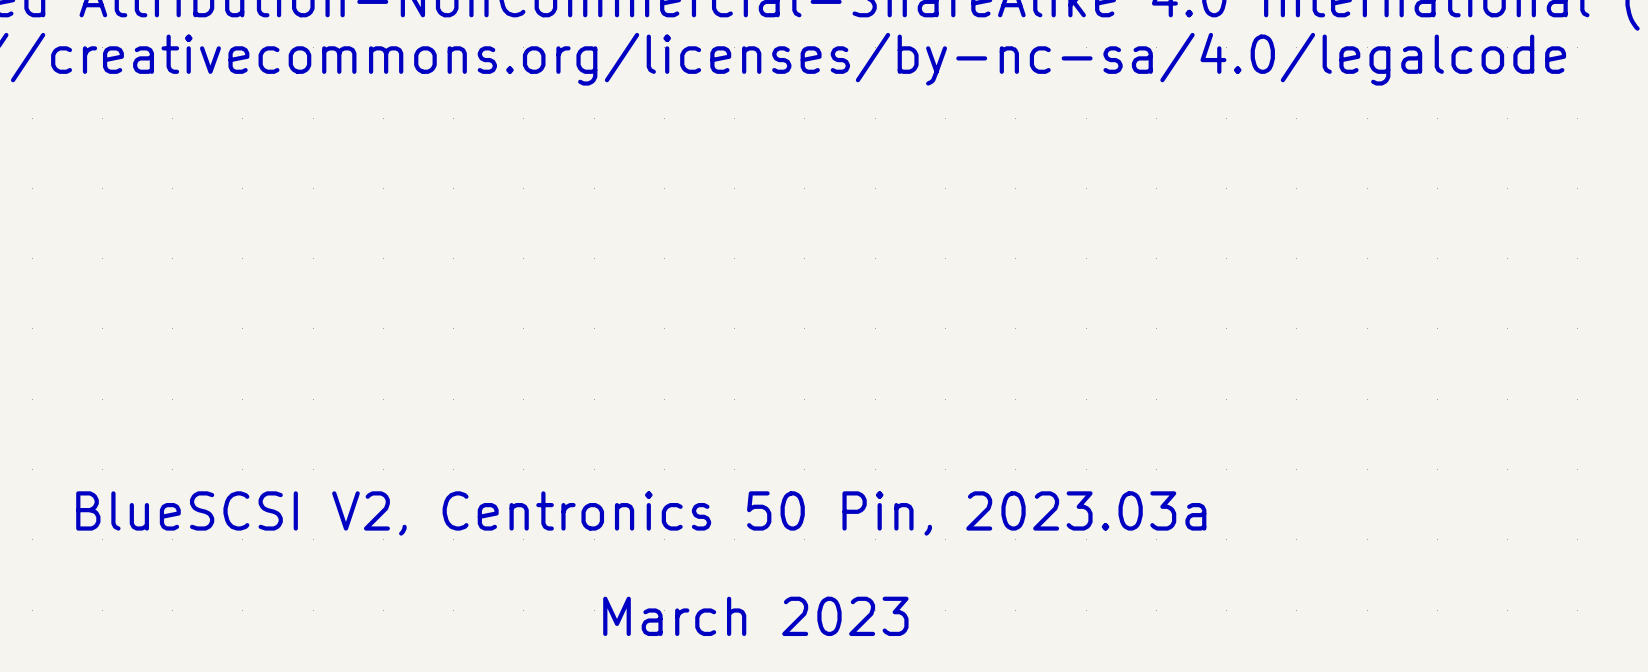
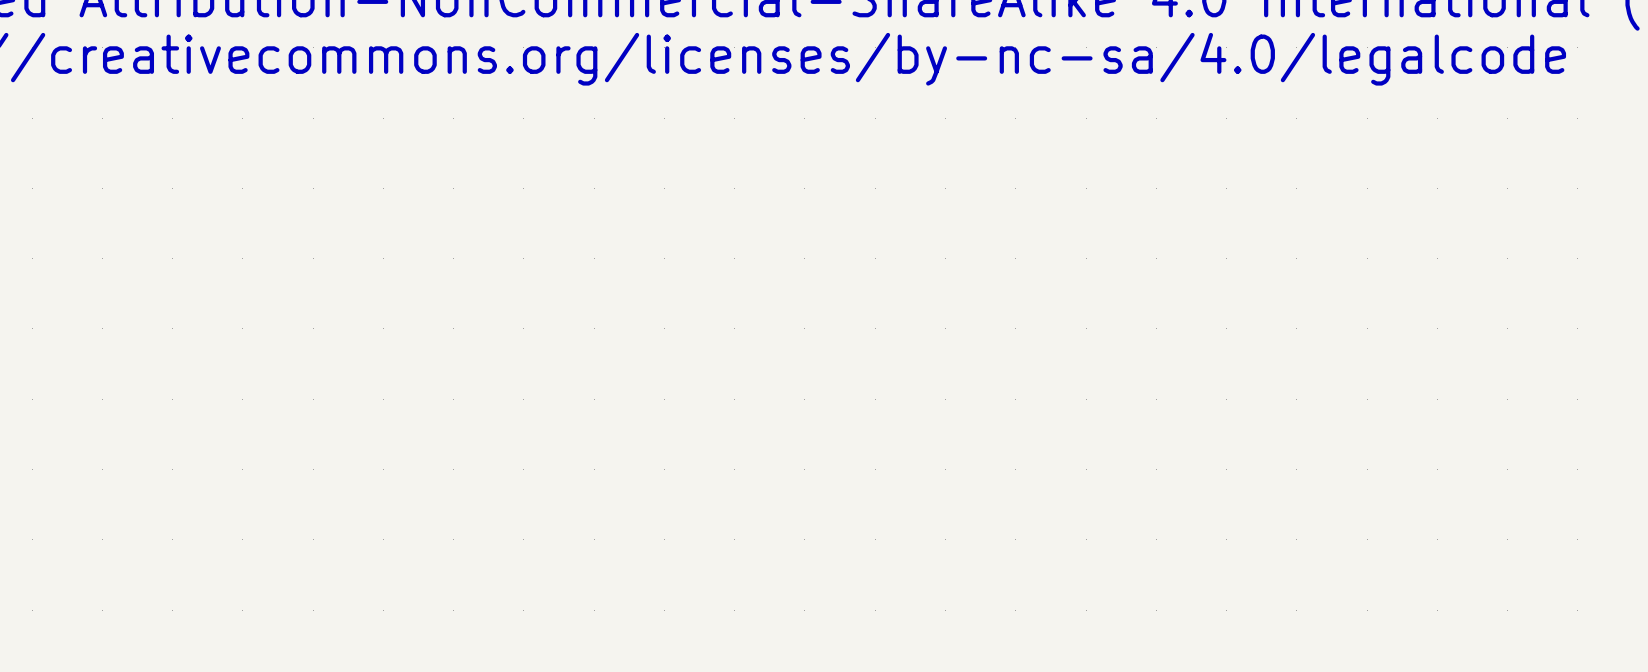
text: BlueSCSI V2, Centronics 50 Pin, 2023.03a (641, 513) -> none
text: March 2023 (755, 616) -> none

